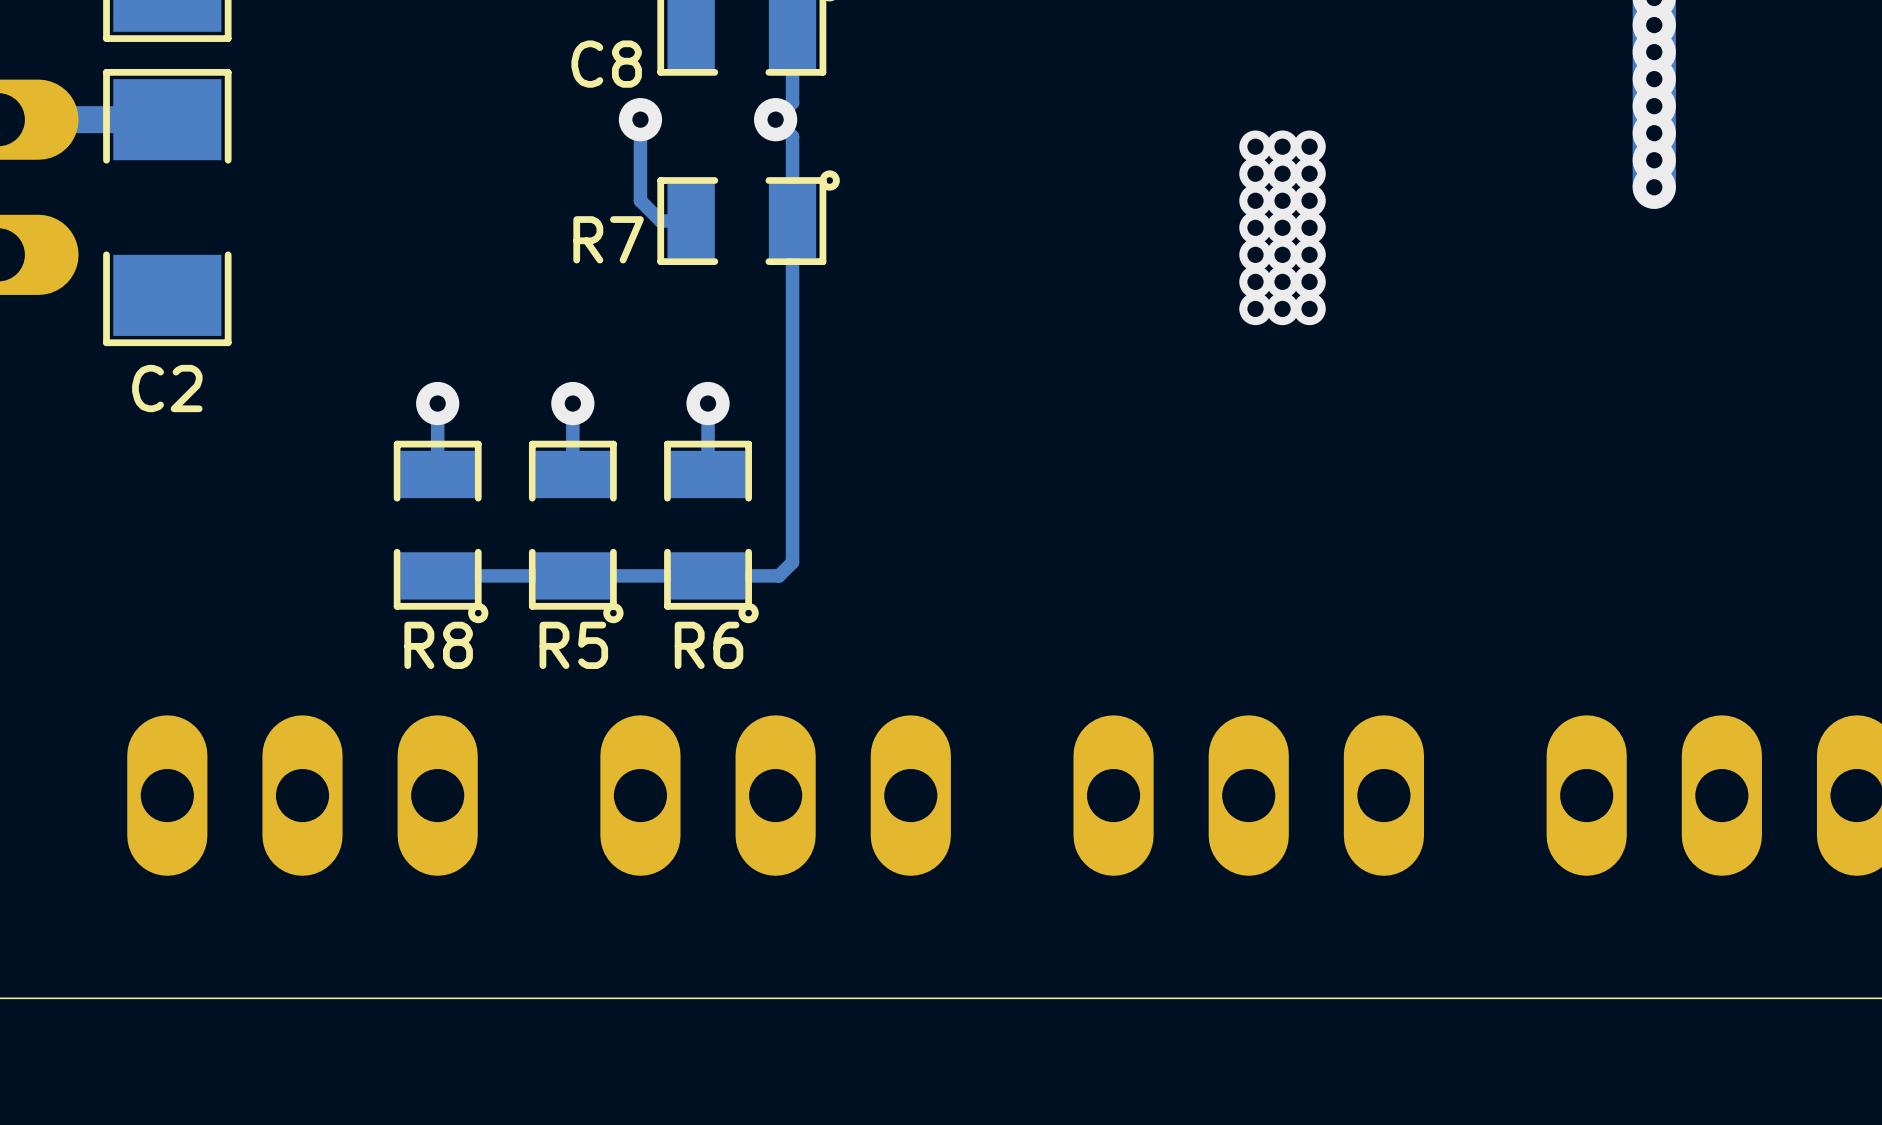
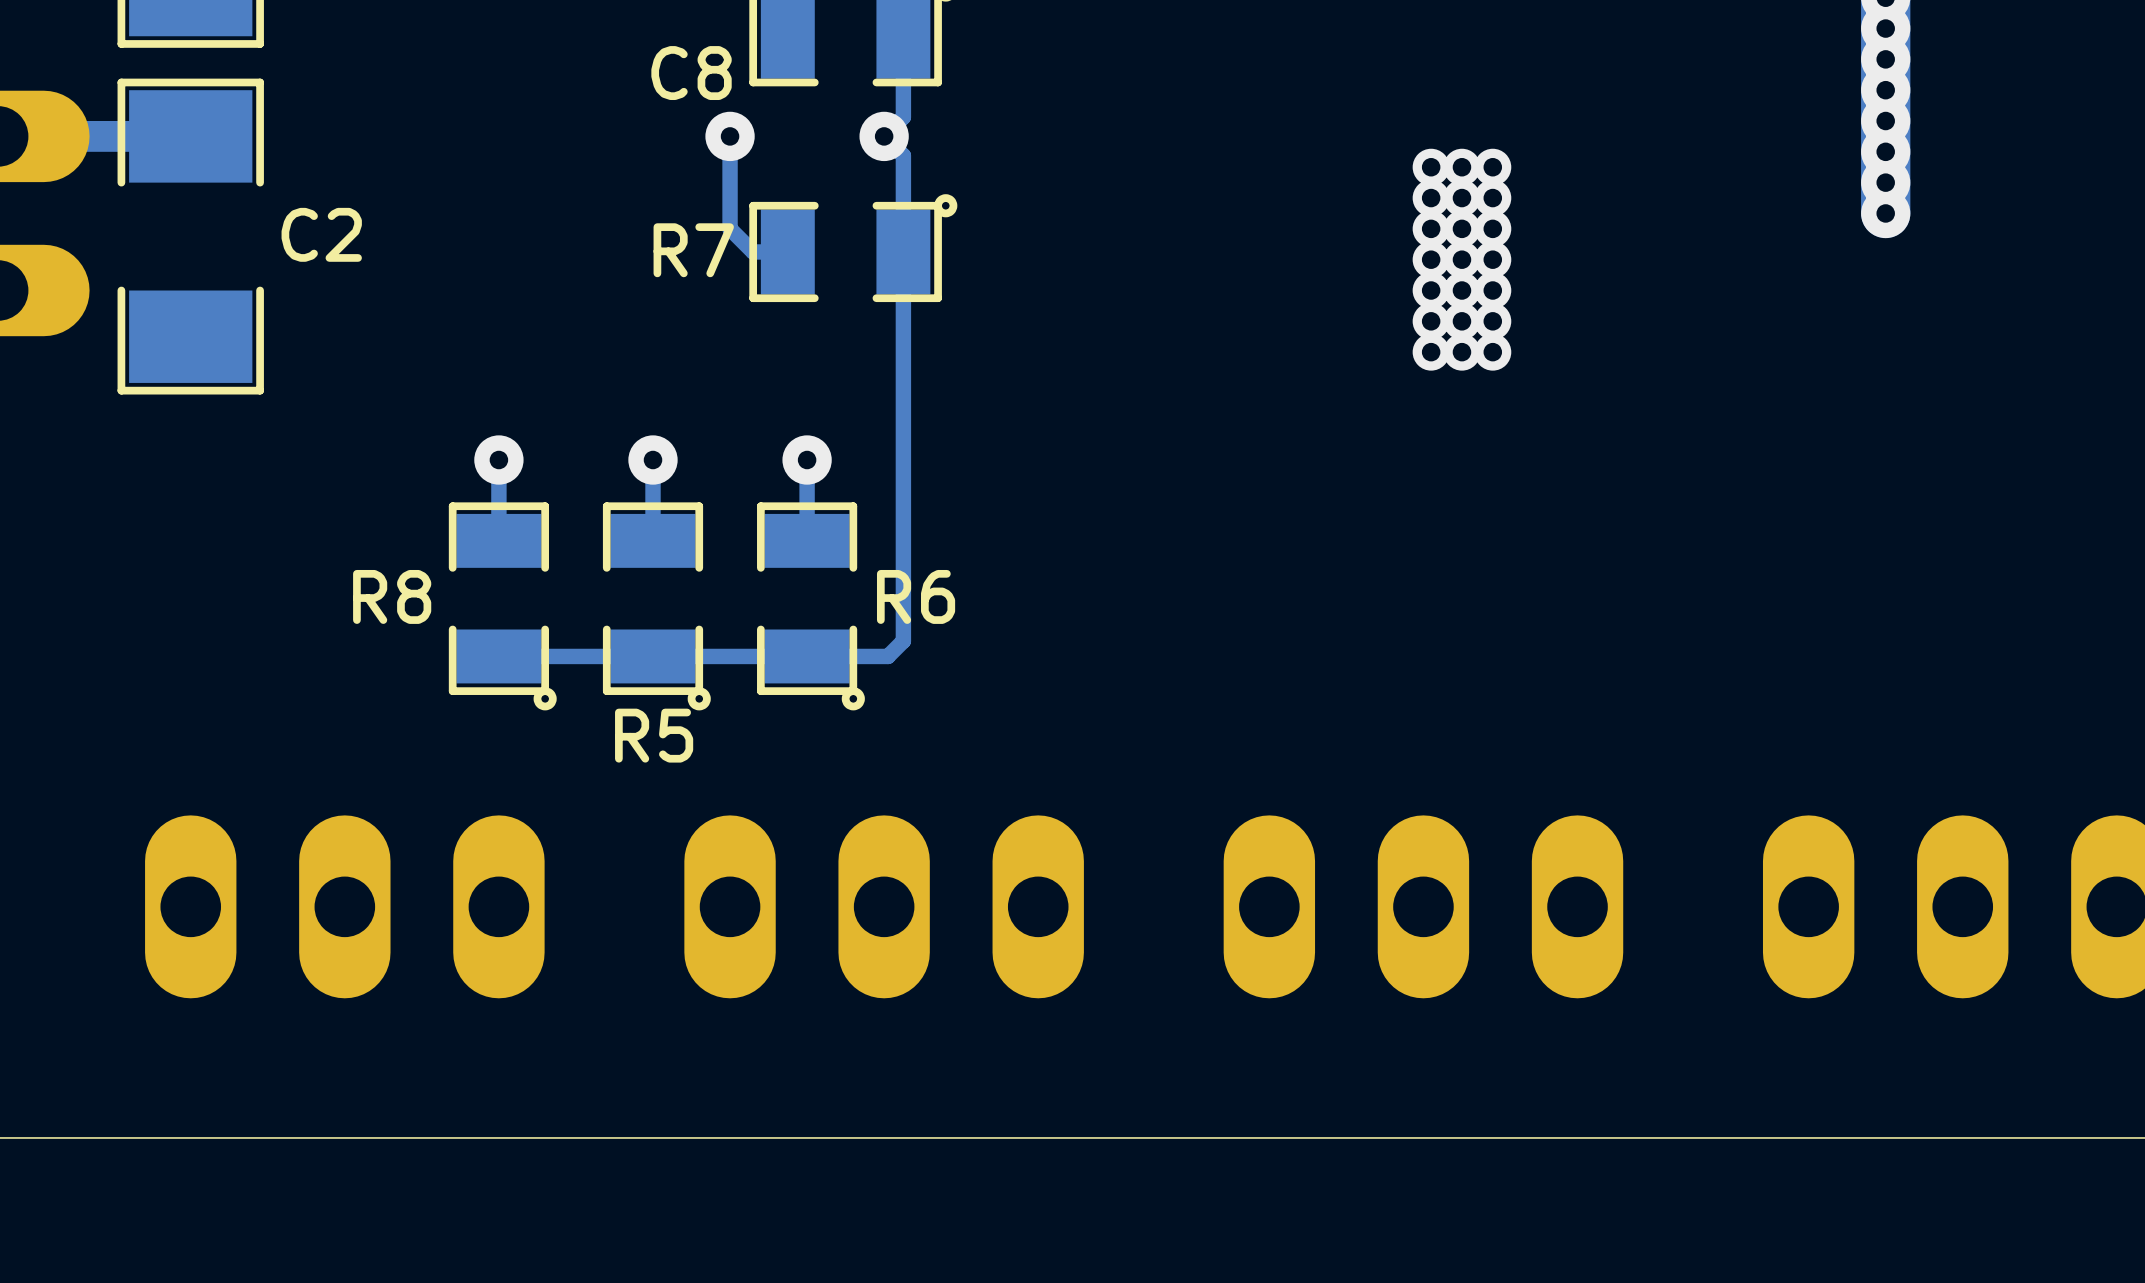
R7 name position: R7 (608, 239) -> R7 (693, 250)
C2 name position: C2 (167, 388) -> C2 (321, 234)
R8 name position: R8 (438, 645) -> R8 (392, 596)
R6 name position: R6 (709, 645) -> R6 (916, 596)

